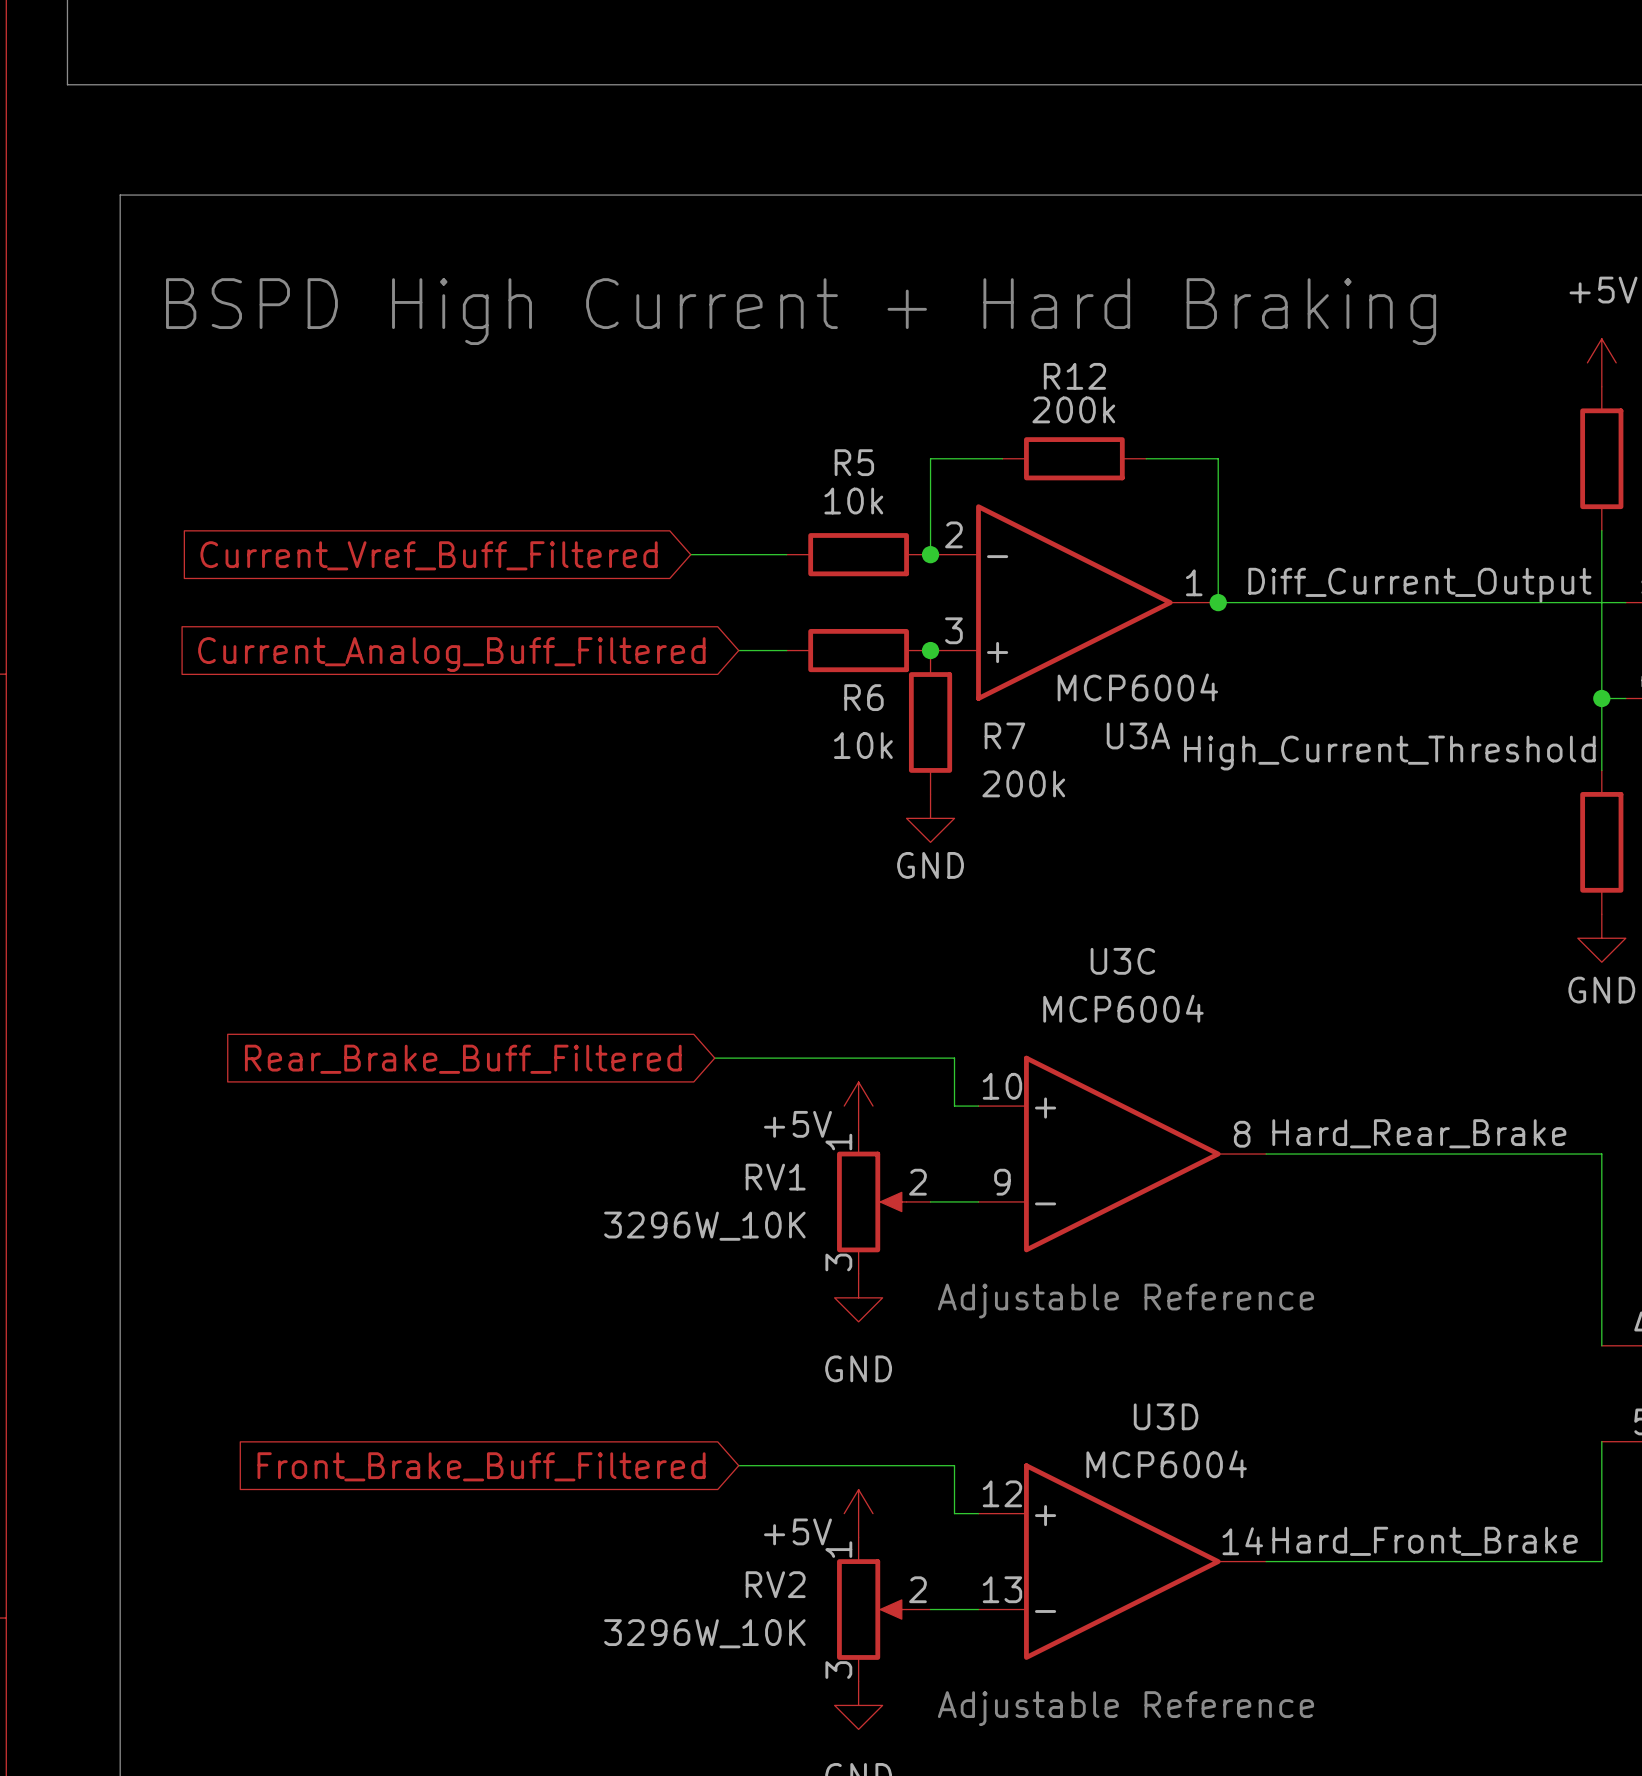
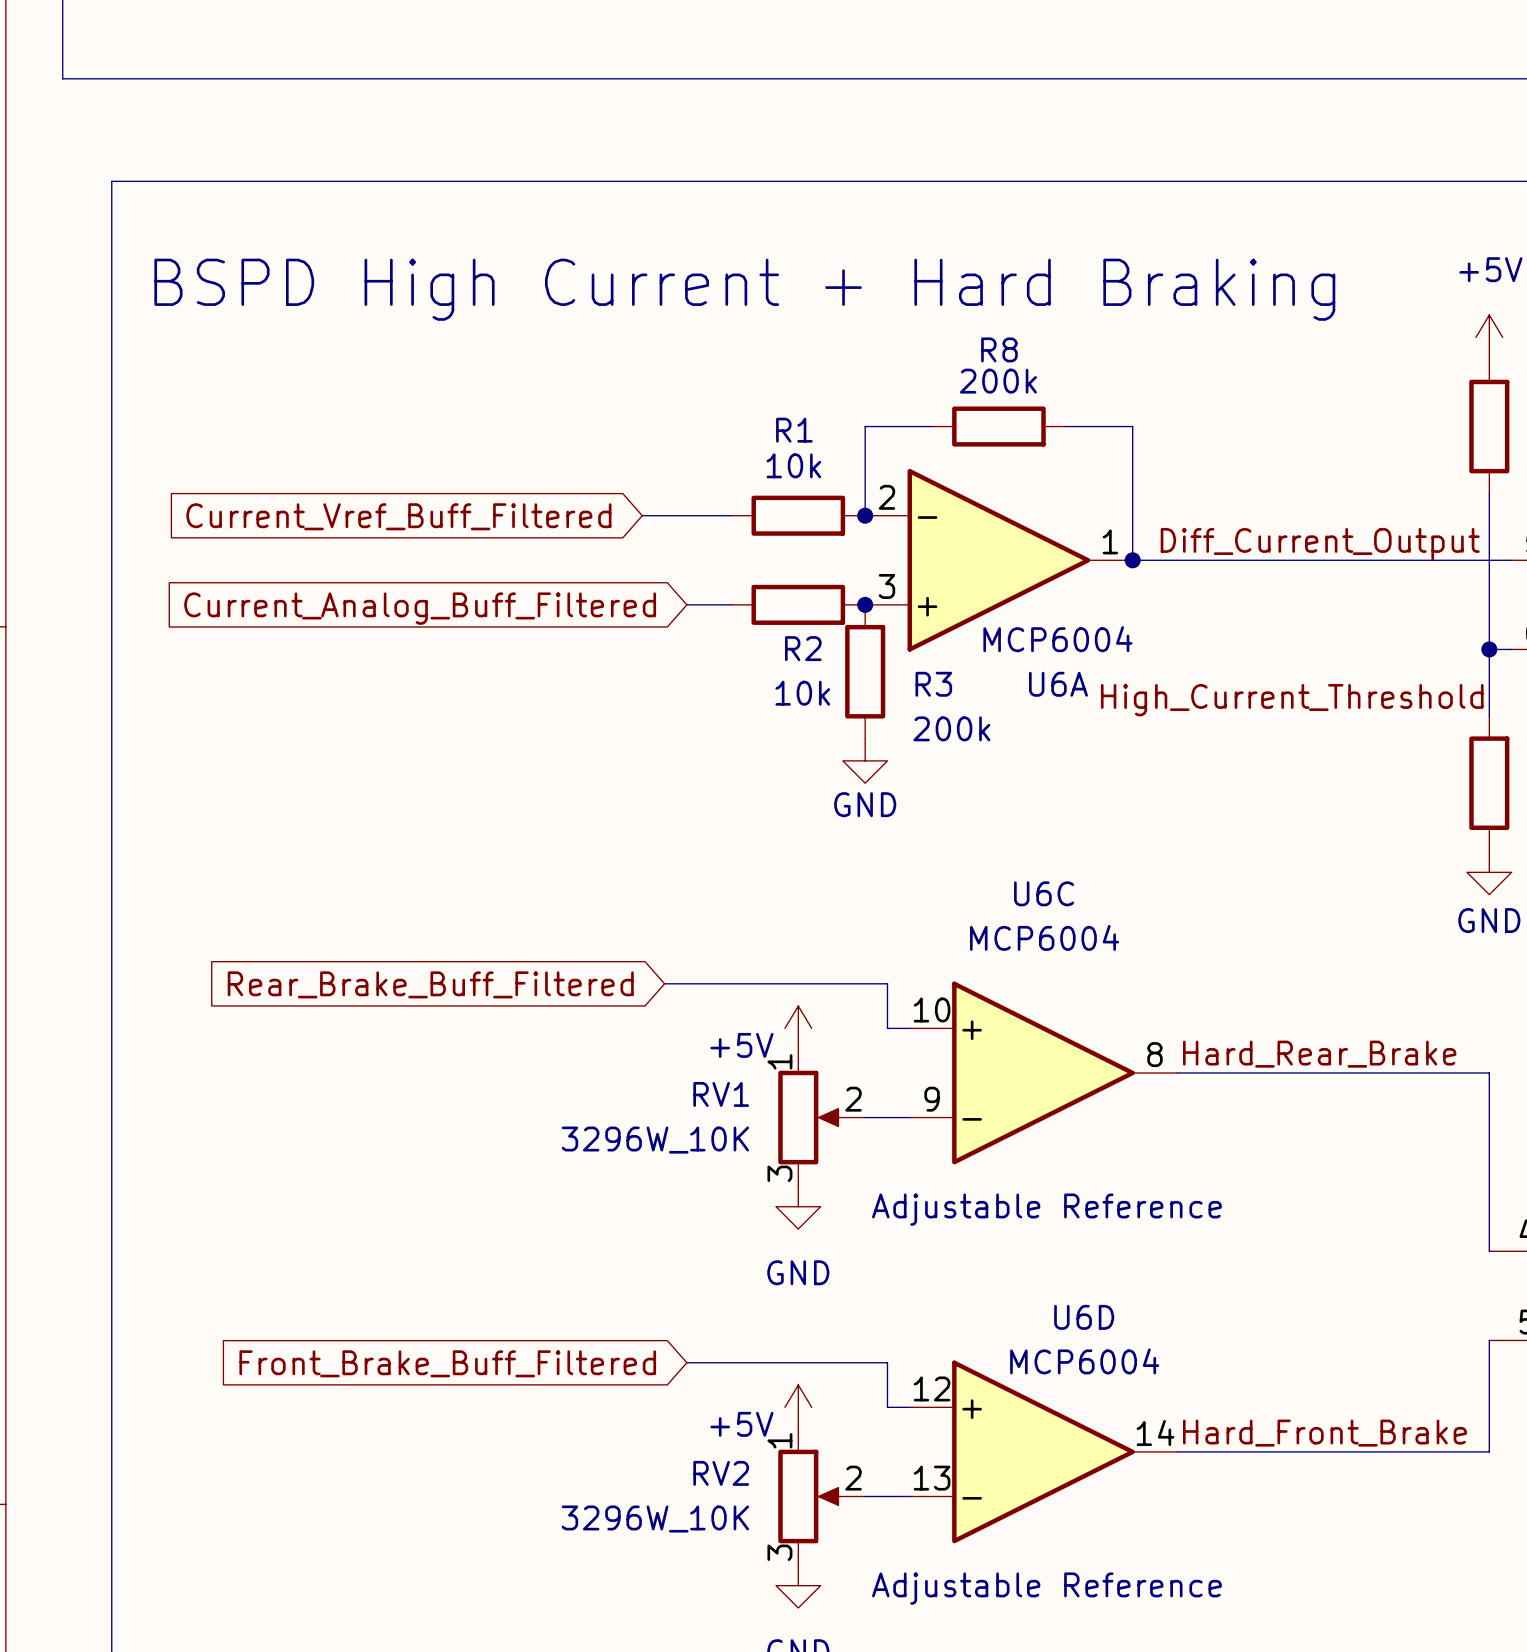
R12 name: R12 (1074, 376) -> R8 (999, 349)
R5 name: R5 (854, 462) -> R1 (794, 430)
R6 name: R6 (863, 697) -> R2 (803, 648)
R7 name: R7 (1004, 735) -> R3 (933, 684)
U3A name: U3A (1138, 735) -> U6A (1058, 684)
U3C name: U3C (1122, 961) -> U6C (1044, 893)
U3D name: U3D (1166, 1416) -> U6D (1084, 1317)

